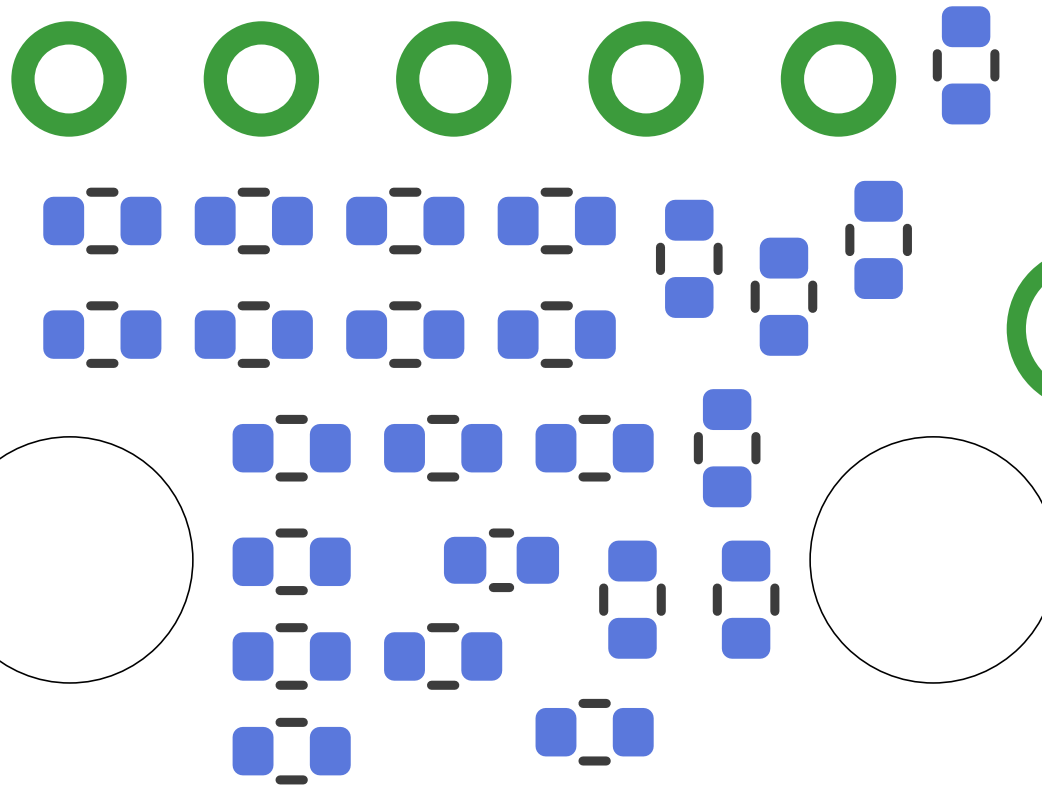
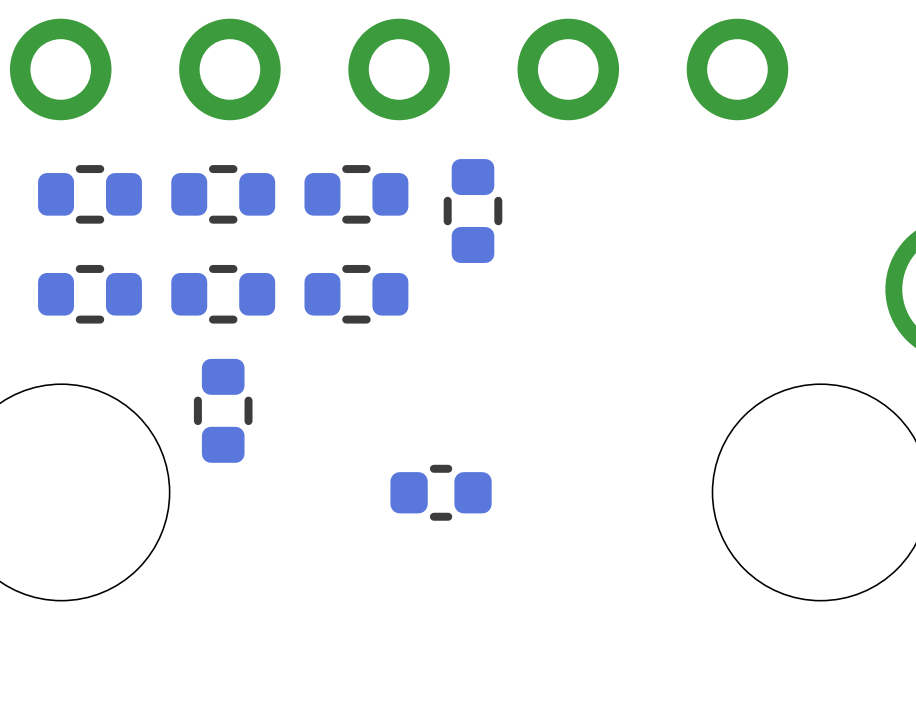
part: (966, 65) -> none
part rotation: 0° (556, 220) -> 90° clockwise (473, 211)
part: (878, 239) -> none
part: (689, 258) -> none
part: (783, 296) -> none
part: (556, 334) -> none
part rotation: 0° (291, 448) -> 90° clockwise (223, 410)
part: (443, 448) -> none
part: (594, 448) -> none
part: (727, 448) -> none
part: (291, 561) -> none
part: (632, 599) -> none
part: (746, 599) -> none
part: (291, 656) -> none
part: (443, 656) -> none
part: (594, 732) -> none
part: (291, 751) -> none

